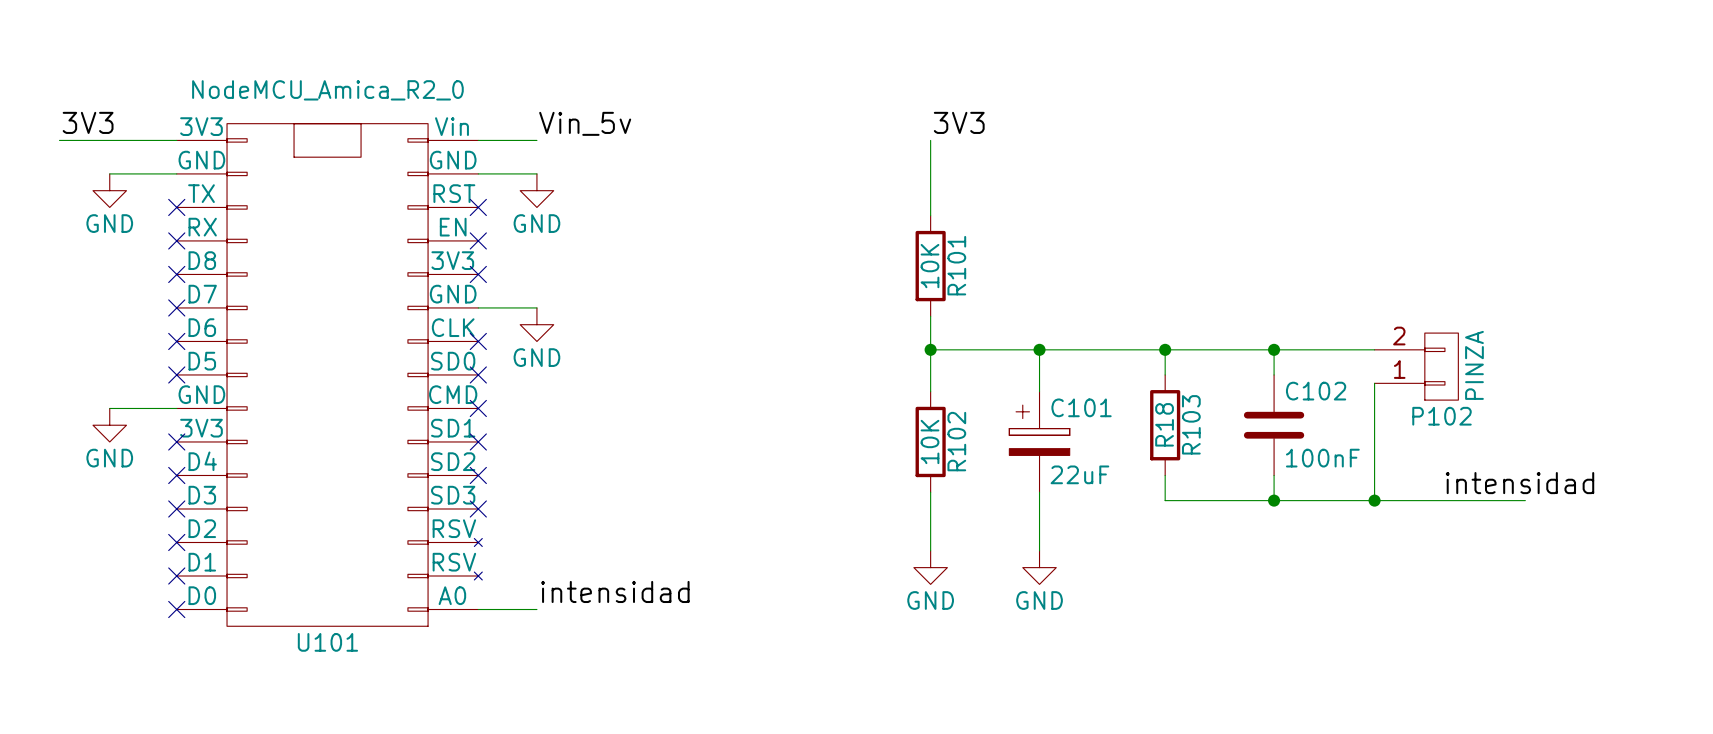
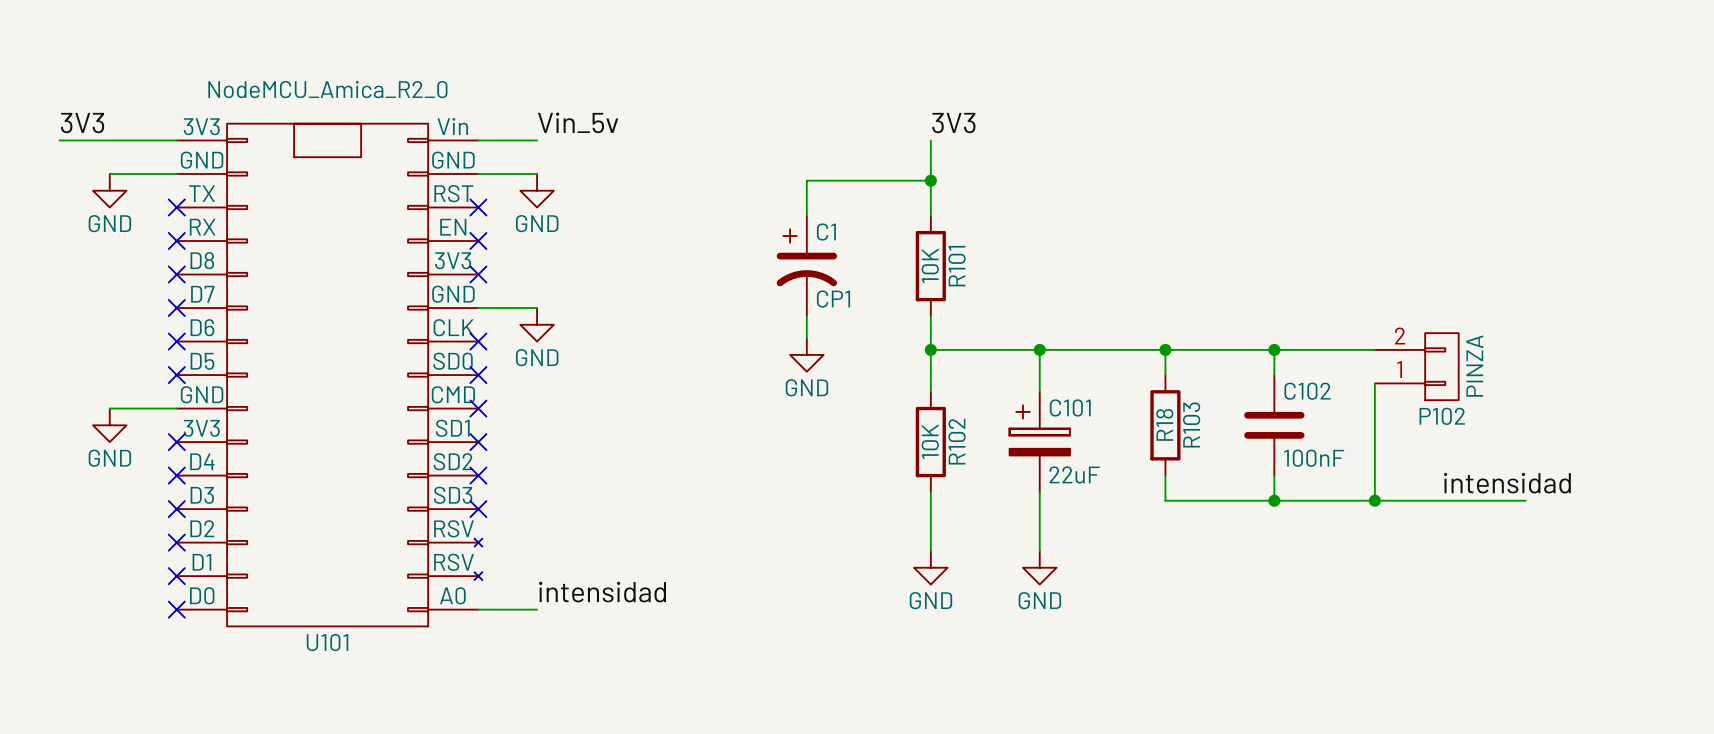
wire: none -> (930, 180) (806, 180) (806, 215)
junction: none -> (930, 180)
C1: none -> CP1 (806, 266)
wire: none -> (806, 316) (806, 338)
power symbol: none -> GND (806, 354)

